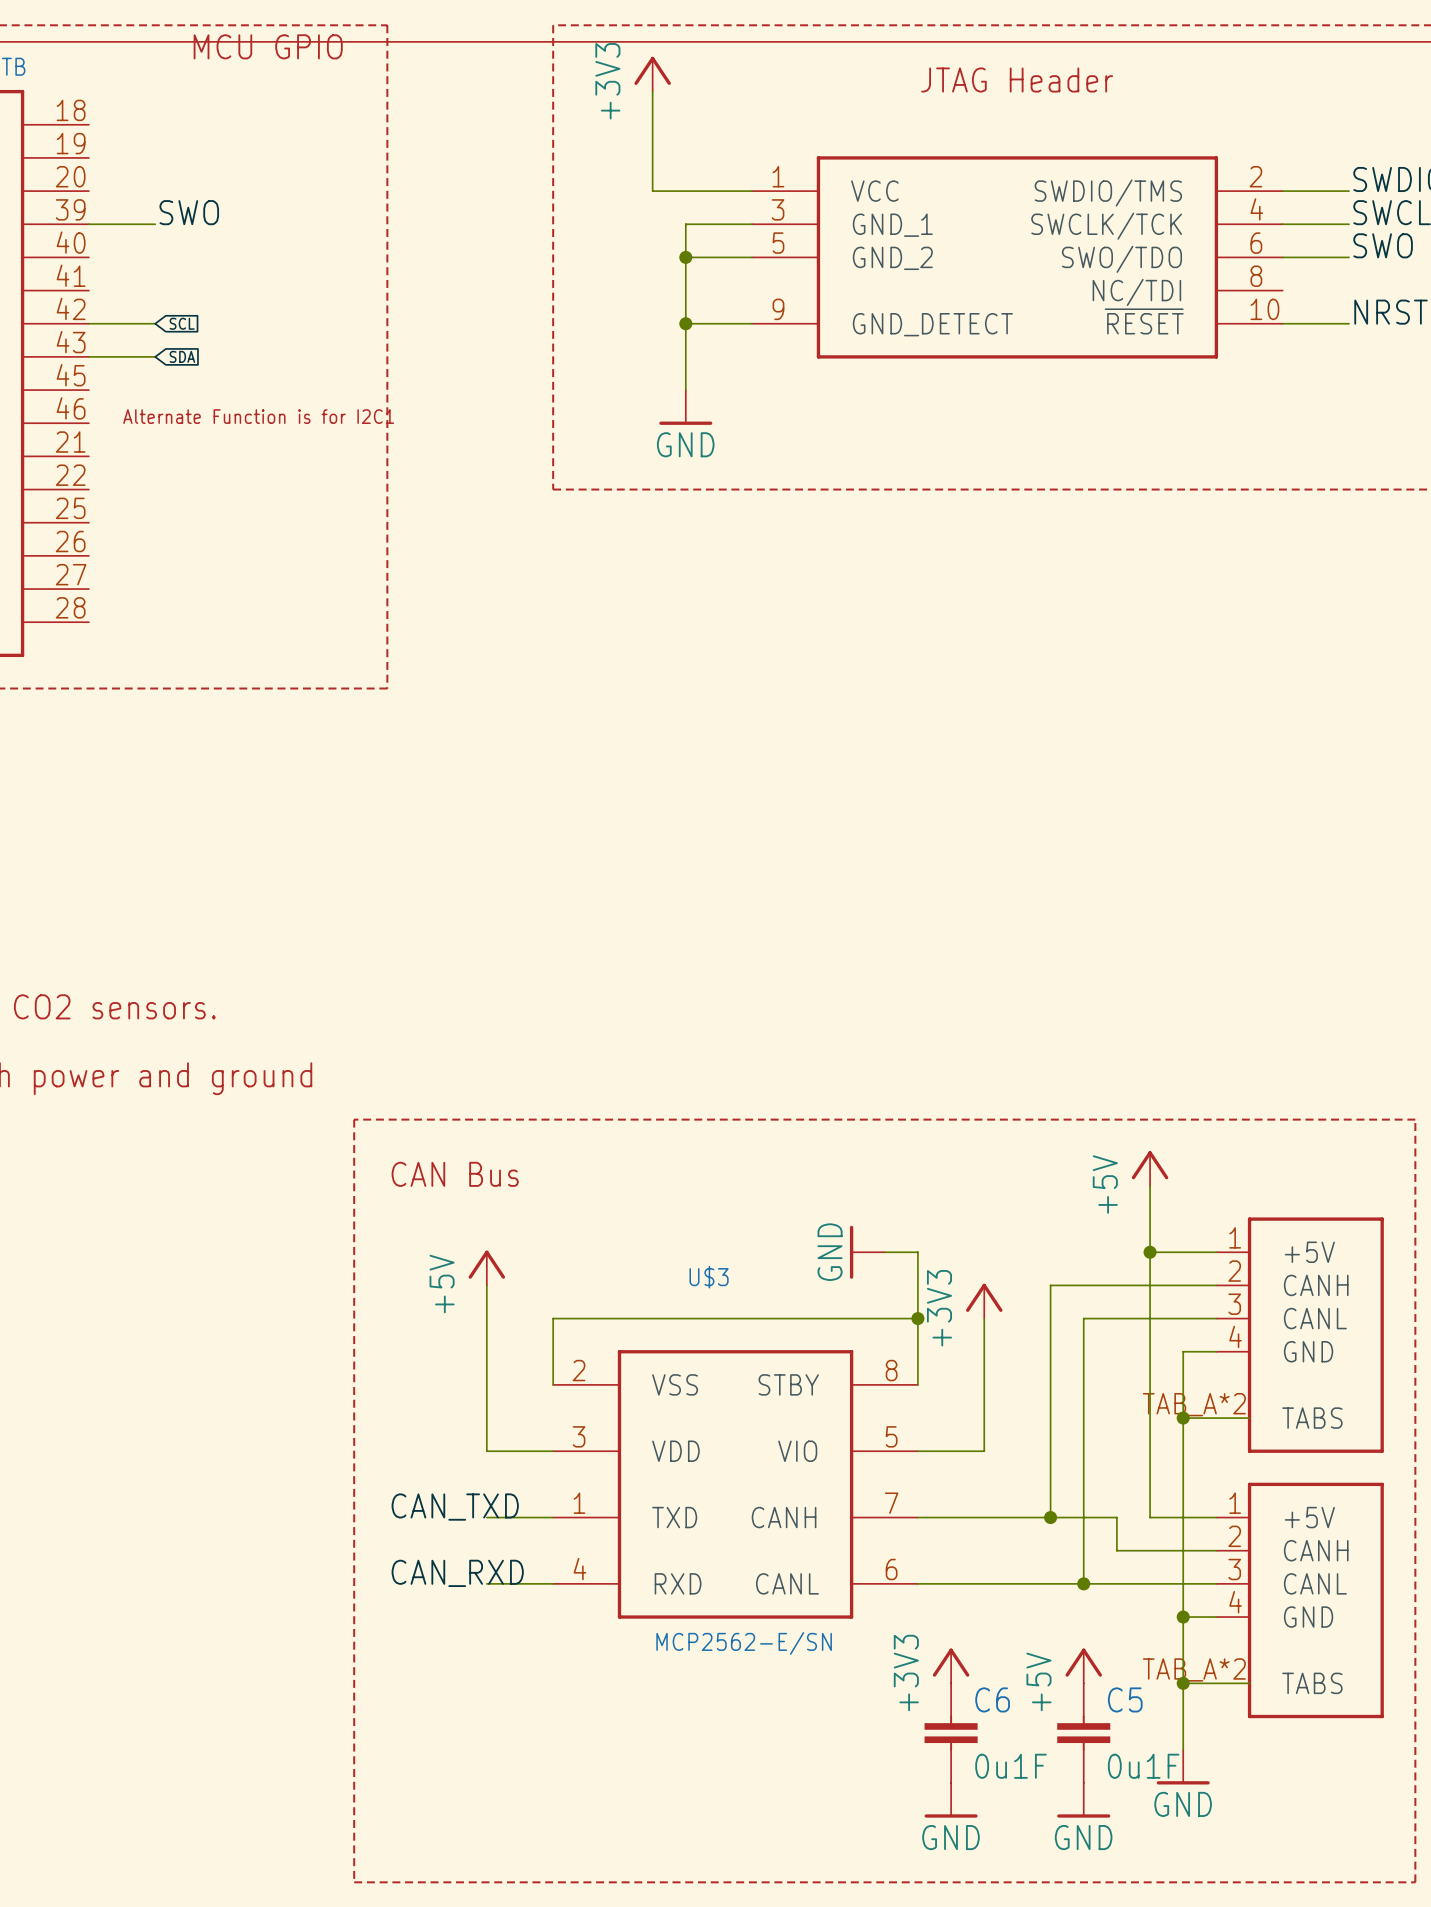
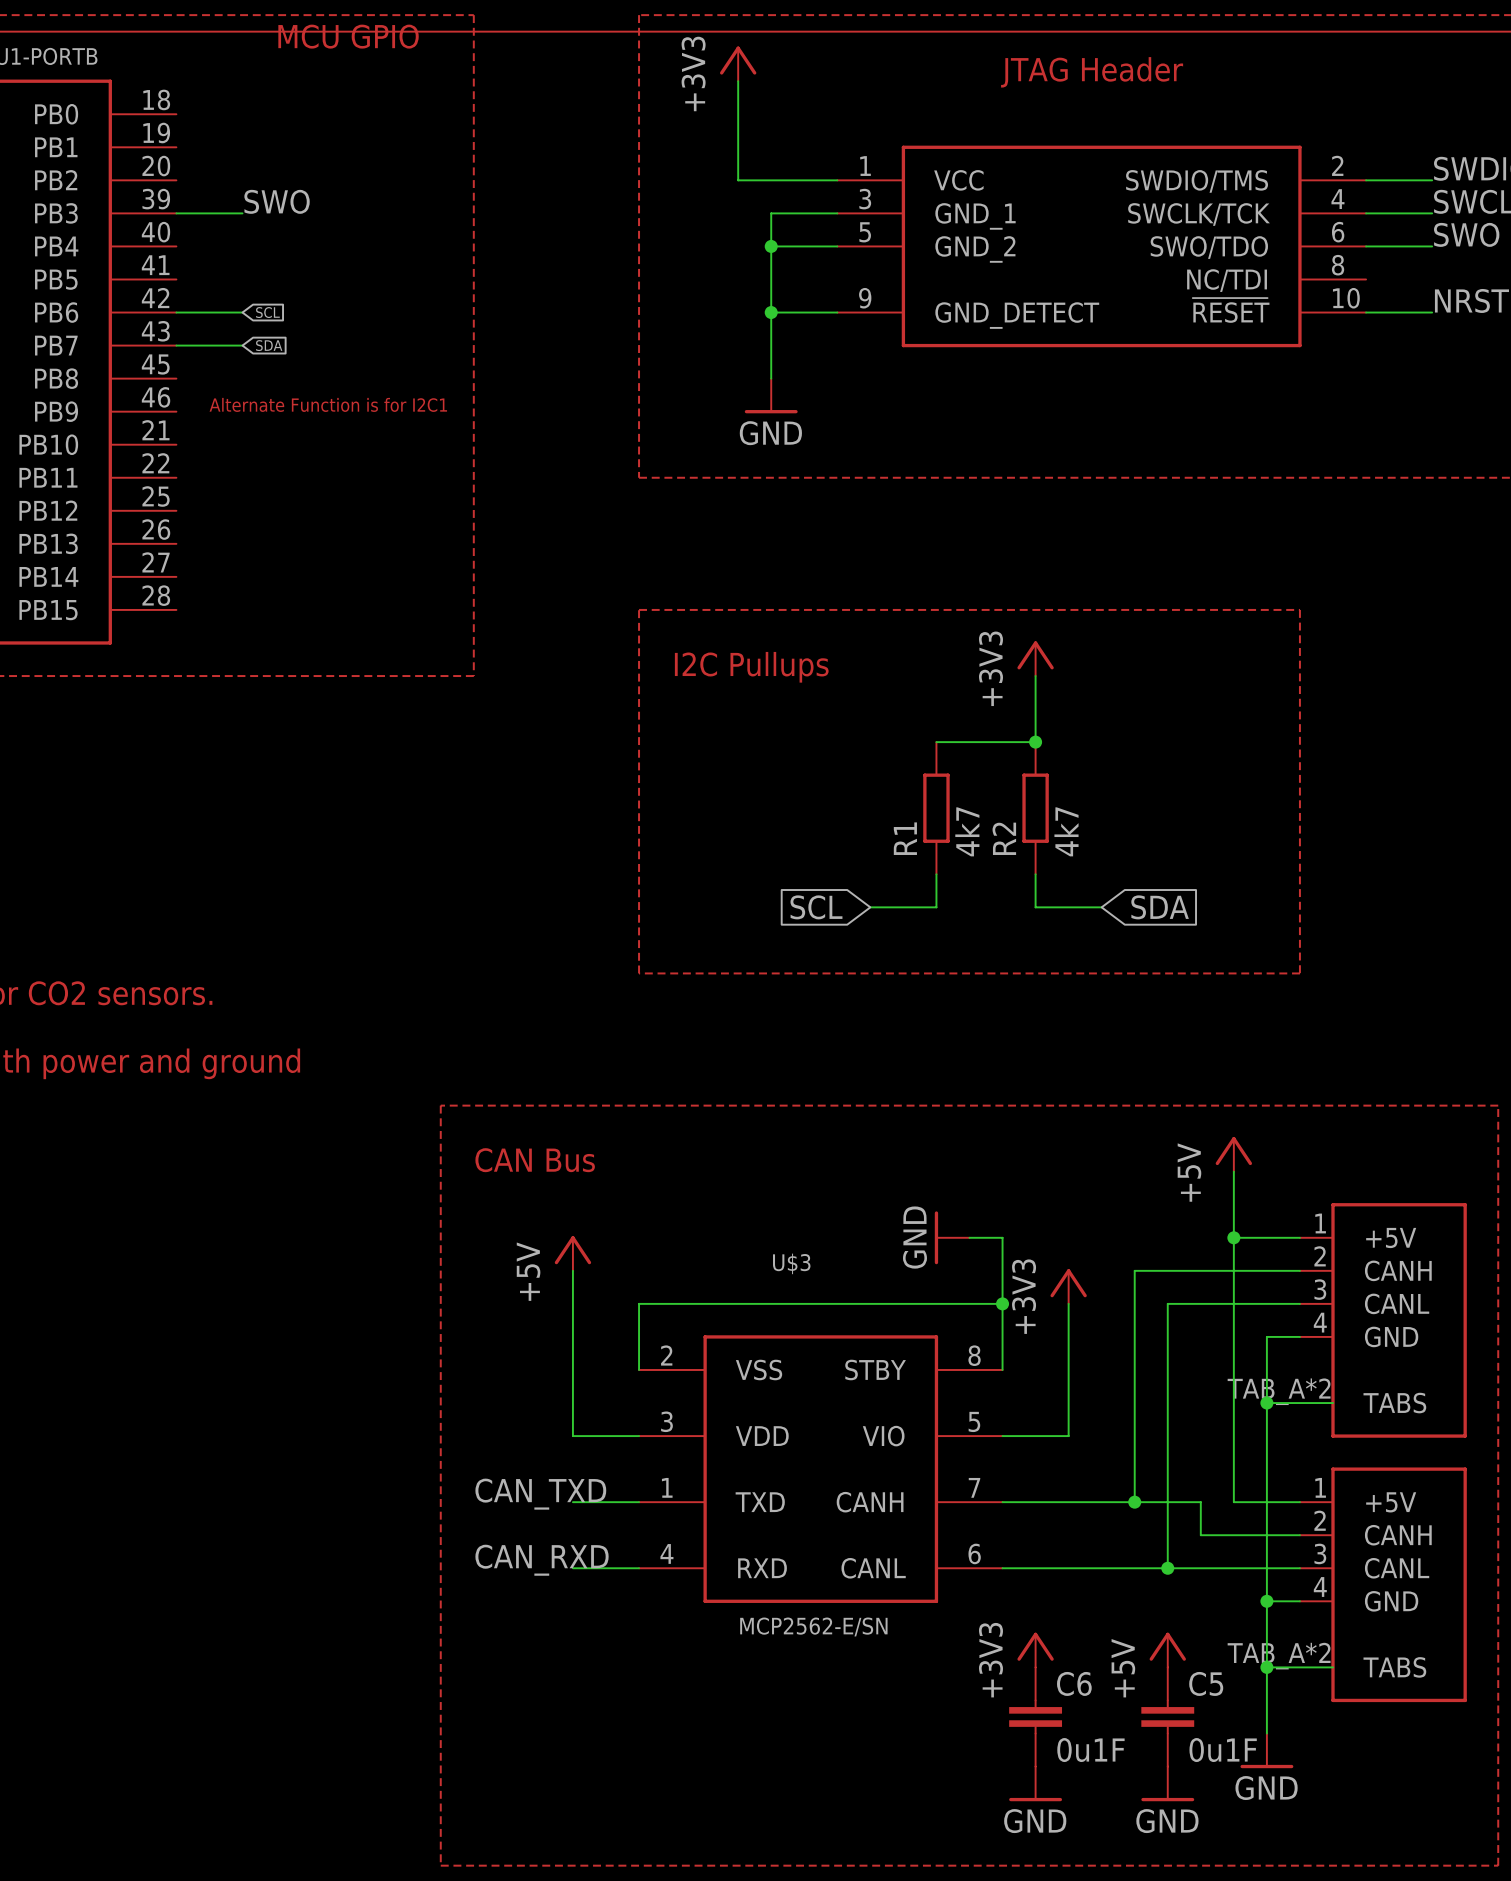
line: none -> (639, 609) (1299, 609) (1299, 973) (639, 973) (639, 609)
power symbol: none -> +3V3 (1035, 658)
text: none -> I2C Pullups (751, 667)
wire: none -> (1035, 676) (1035, 742) (936, 742)
junction: none -> (1035, 742)
R1: none -> 4k7 (936, 808)
R2: none -> 4k7 (1035, 808)
wire: none -> (936, 874) (936, 907) (870, 907)
wire: none -> (1035, 874) (1035, 907) (1101, 907)
global label: none -> SCL (816, 907)
global label: none -> SDA (1160, 907)

